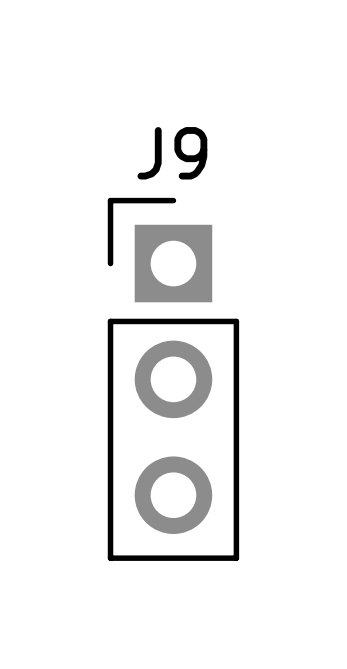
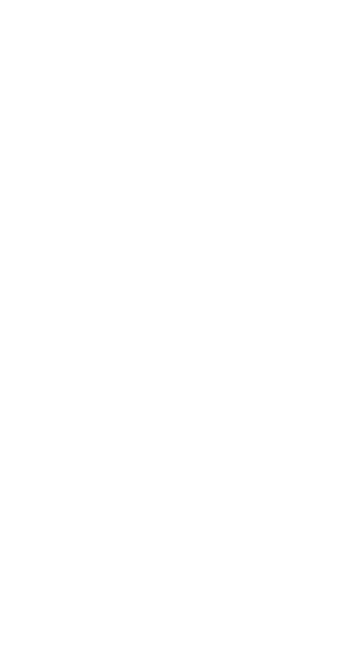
J9: (173, 379) -> none

